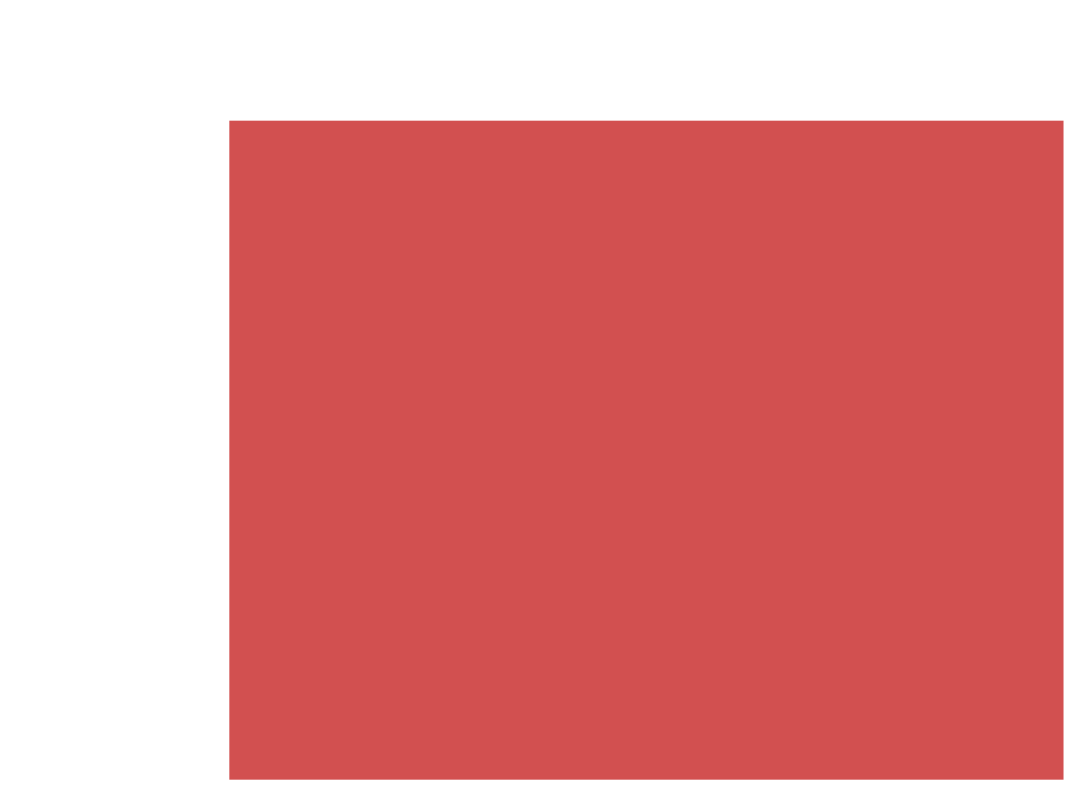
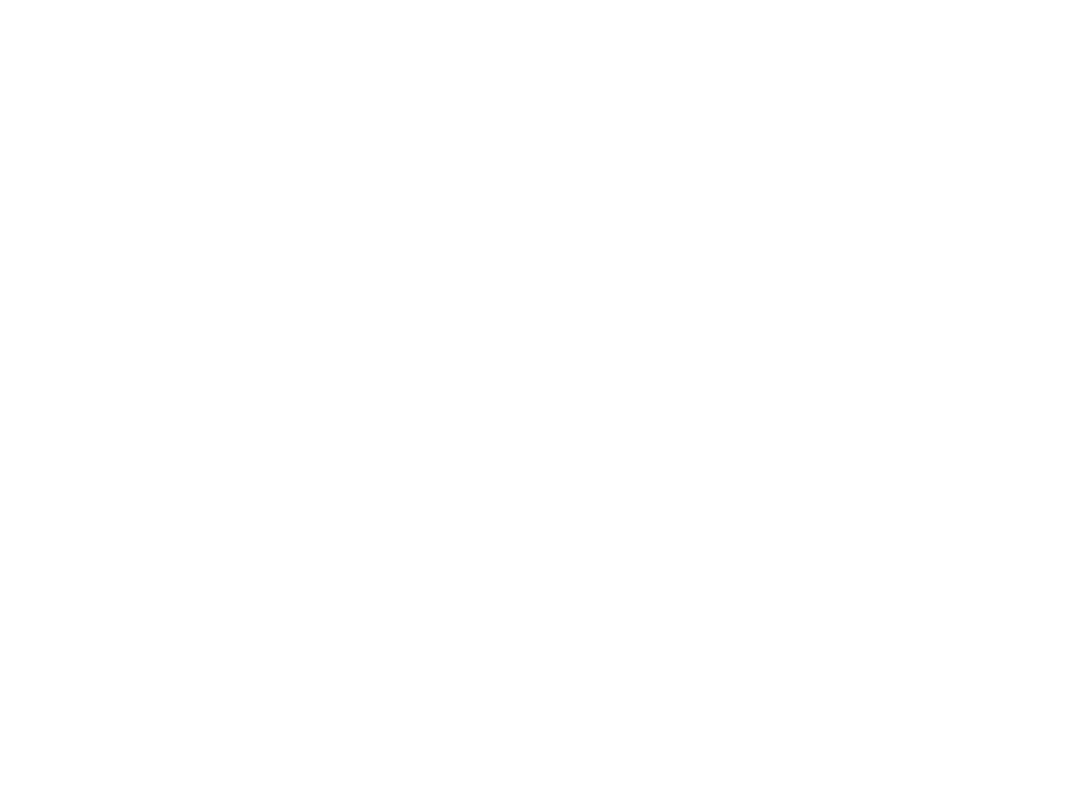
drawing: [229, 120, 1064, 780] -> none

